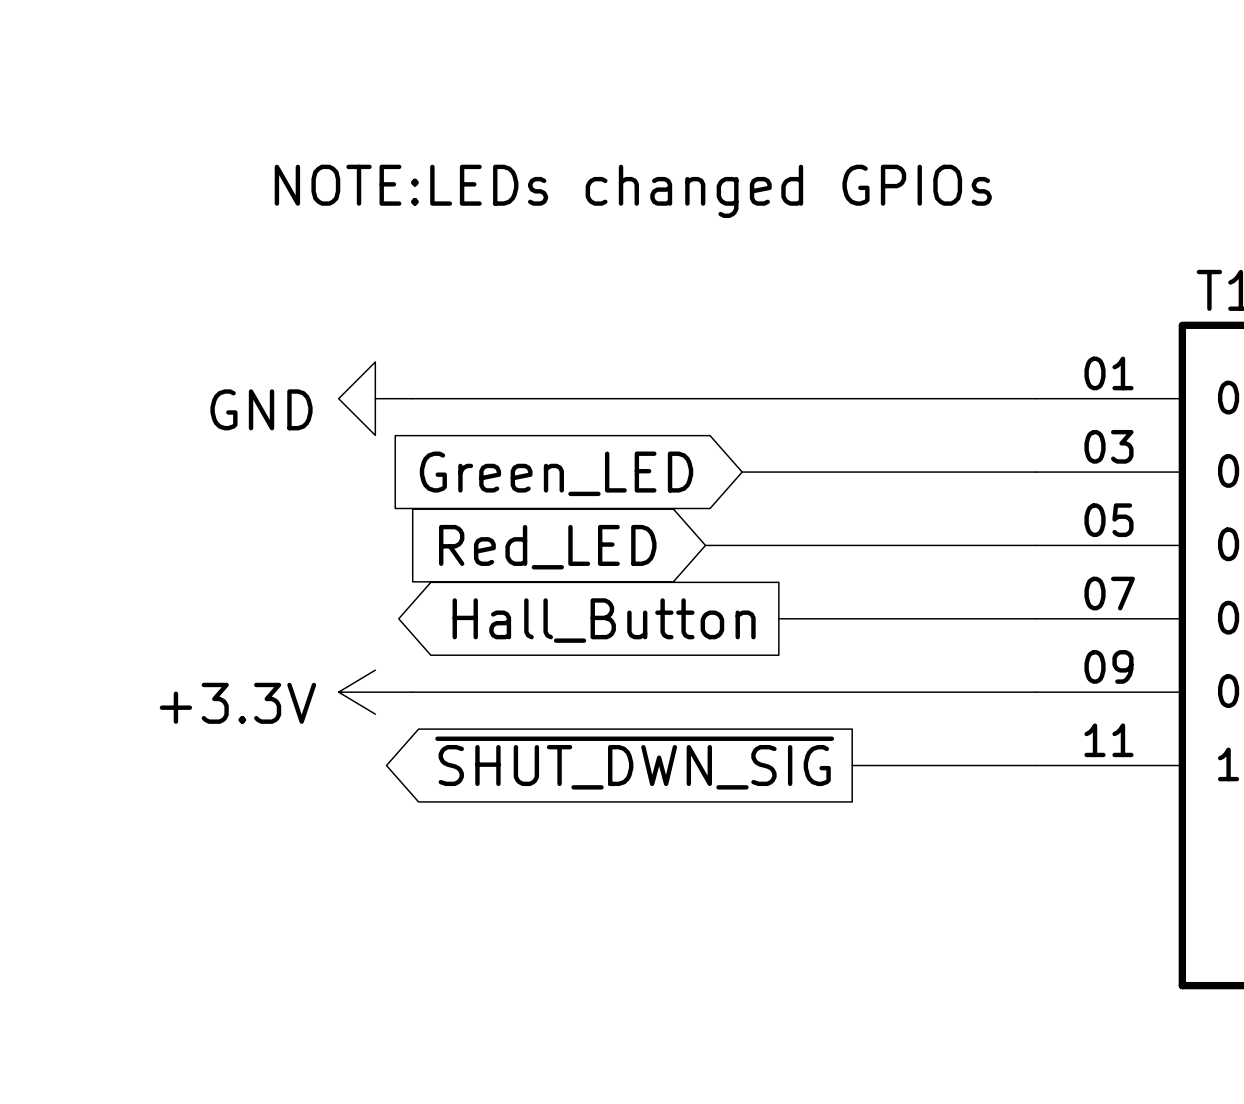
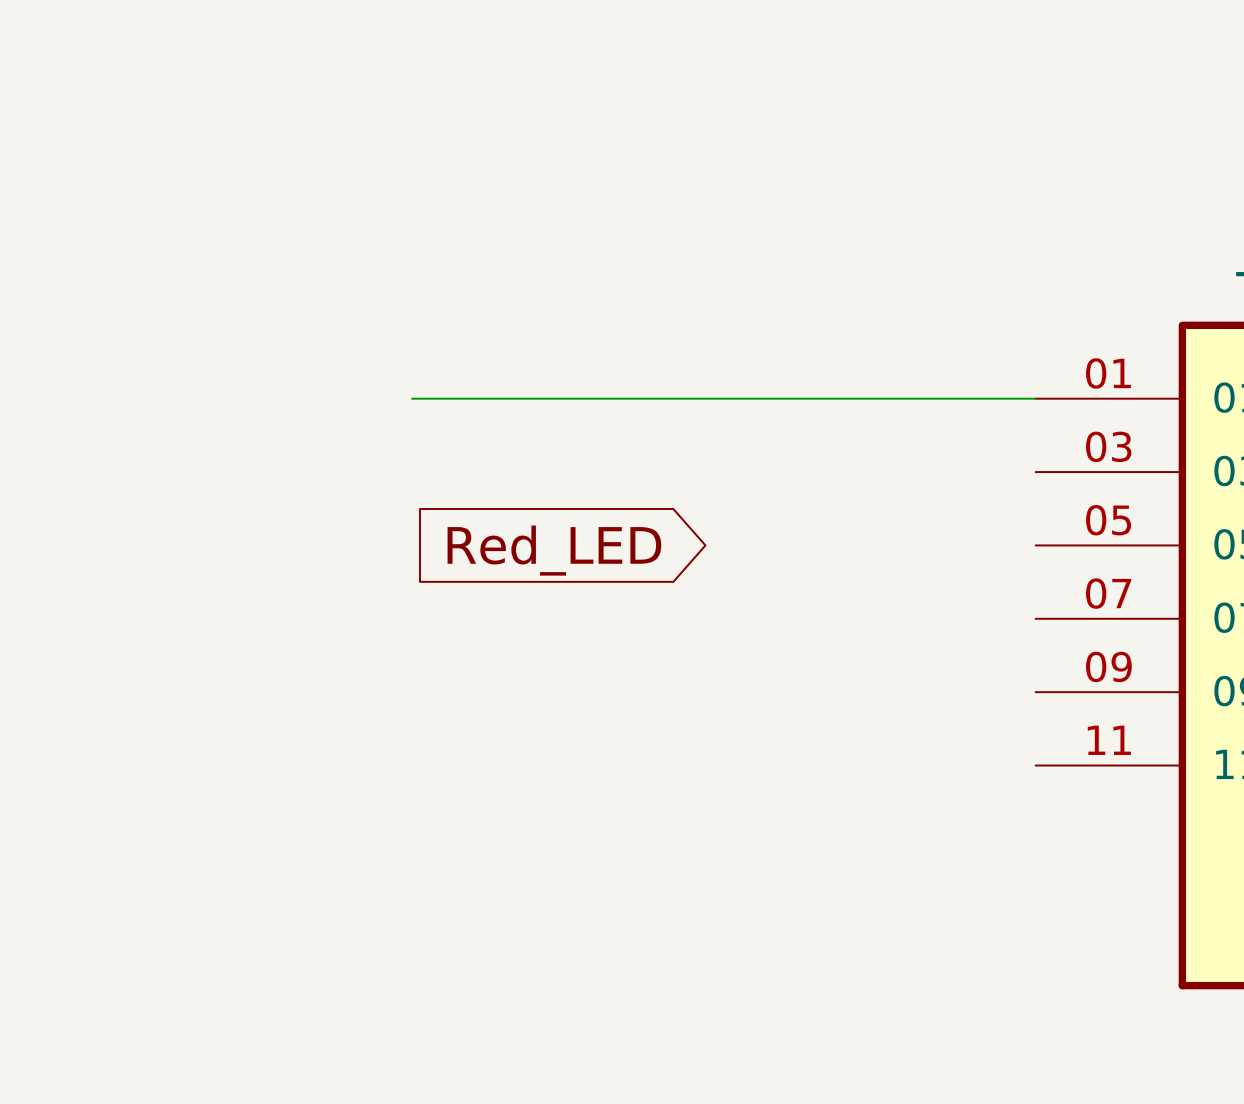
text: NOTE:LEDs changed GPIOs (633, 191) -> none
power symbol: GND (375, 398) -> none
wire: (742, 472) (1035, 472) -> none
global label: Green_LED (556, 473) -> none
wire: (705, 545) (1035, 545) -> none
wire: (778, 618) (1035, 618) -> none
global label: Hall_Button (604, 620) -> none
power symbol: +3.3V (375, 692) -> none
wire: (412, 692) (1035, 692) -> none
global label: ~{SHUT_DWN_SIG} (634, 763) -> none
wire: (852, 765) (1035, 765) -> none

